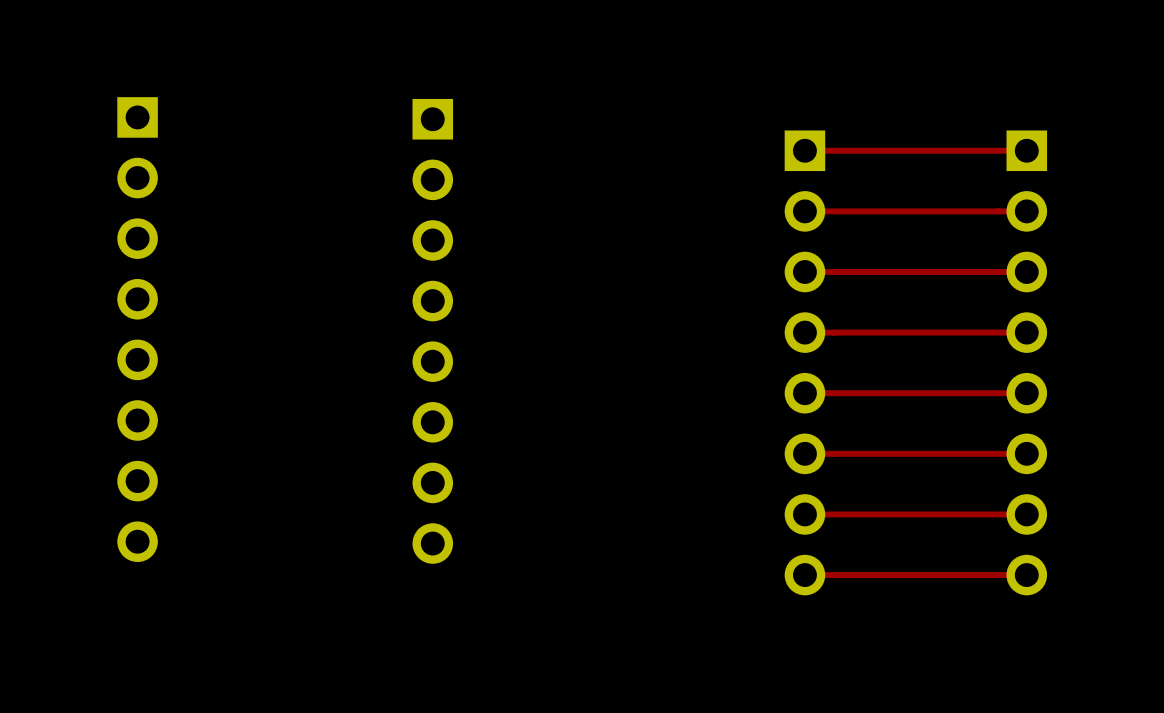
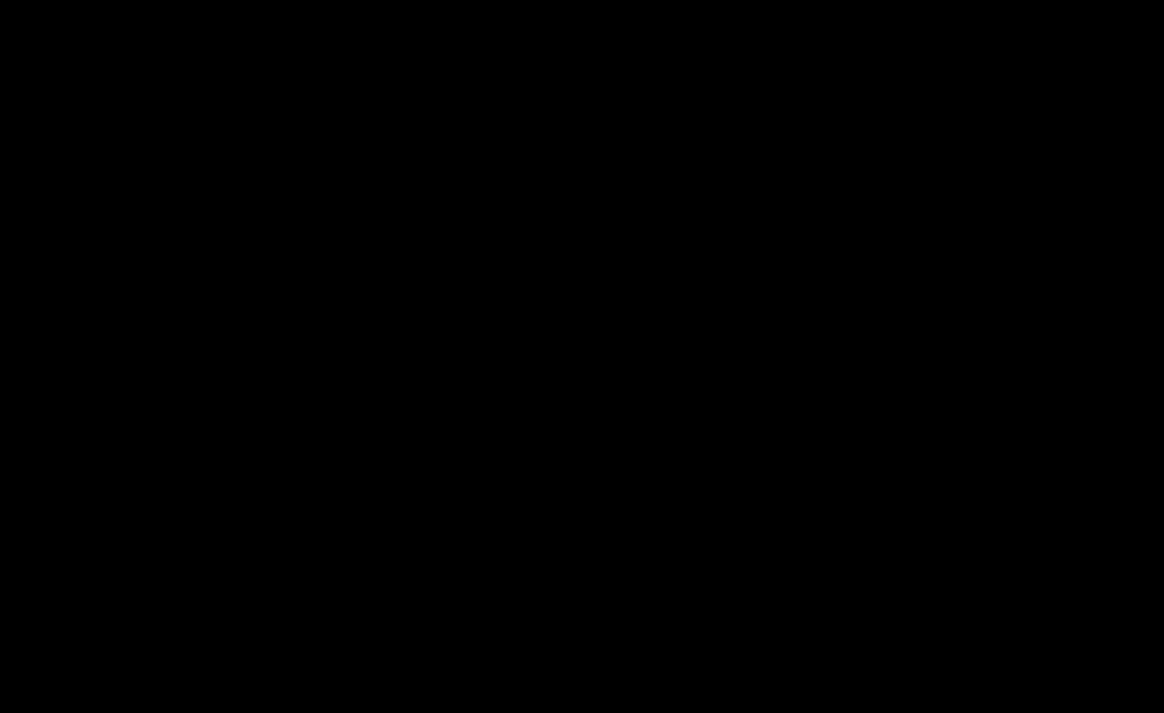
top track: (1026, 150) (804, 150) -> none
top track: (1026, 211) (804, 211) -> none
top track: (1026, 271) (804, 271) -> none
part: (137, 329) -> none
part: (432, 331) -> none
top track: (1026, 332) (804, 332) -> none
part: (804, 362) -> none
part: (1026, 362) -> none
top track: (1026, 393) (804, 393) -> none
top track: (1026, 453) (804, 453) -> none
top track: (1026, 514) (804, 514) -> none
top track: (1026, 575) (804, 575) -> none

